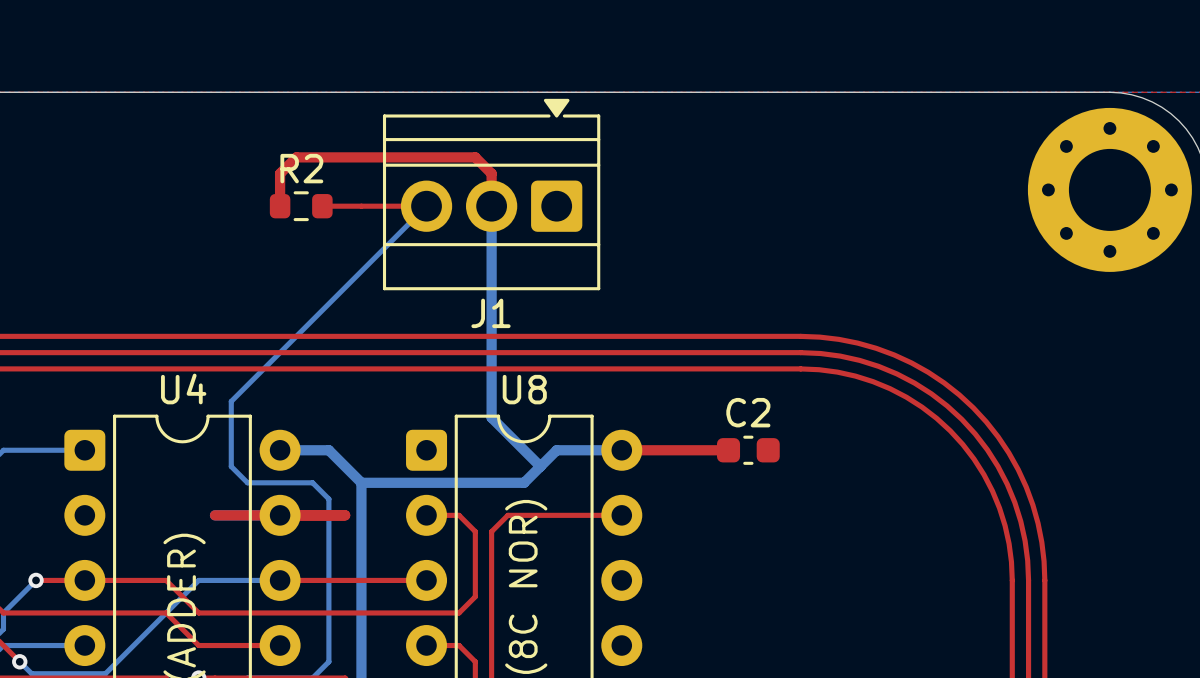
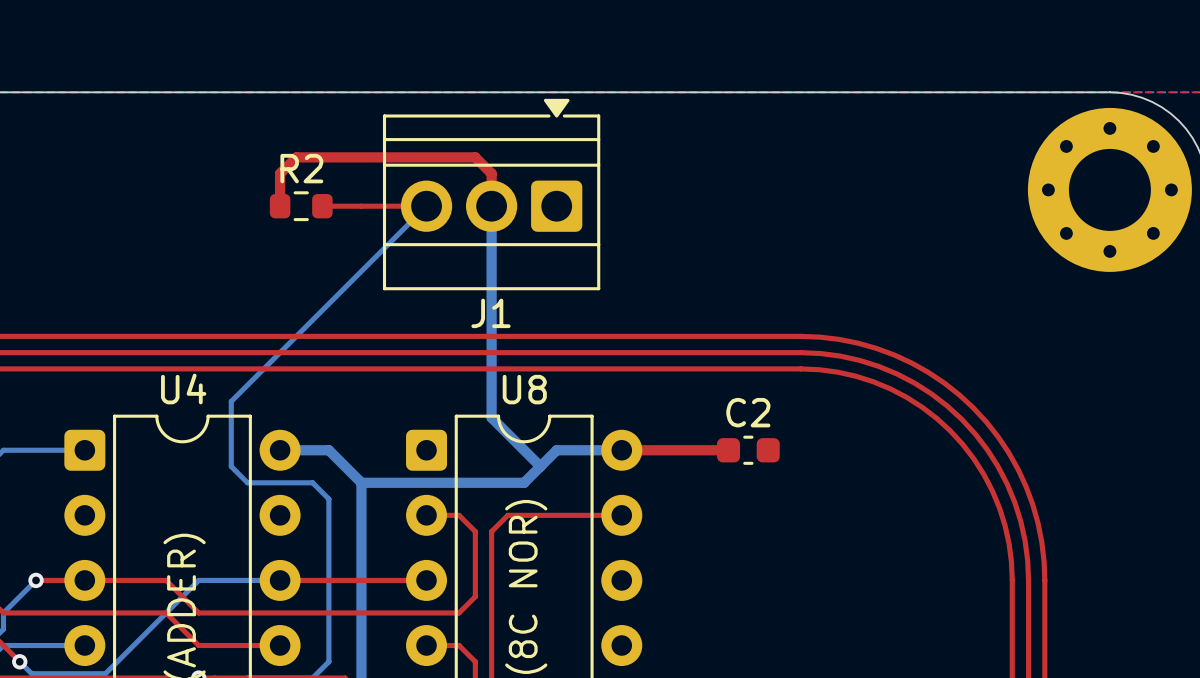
top track: (215, 515) (345, 515) -> none

